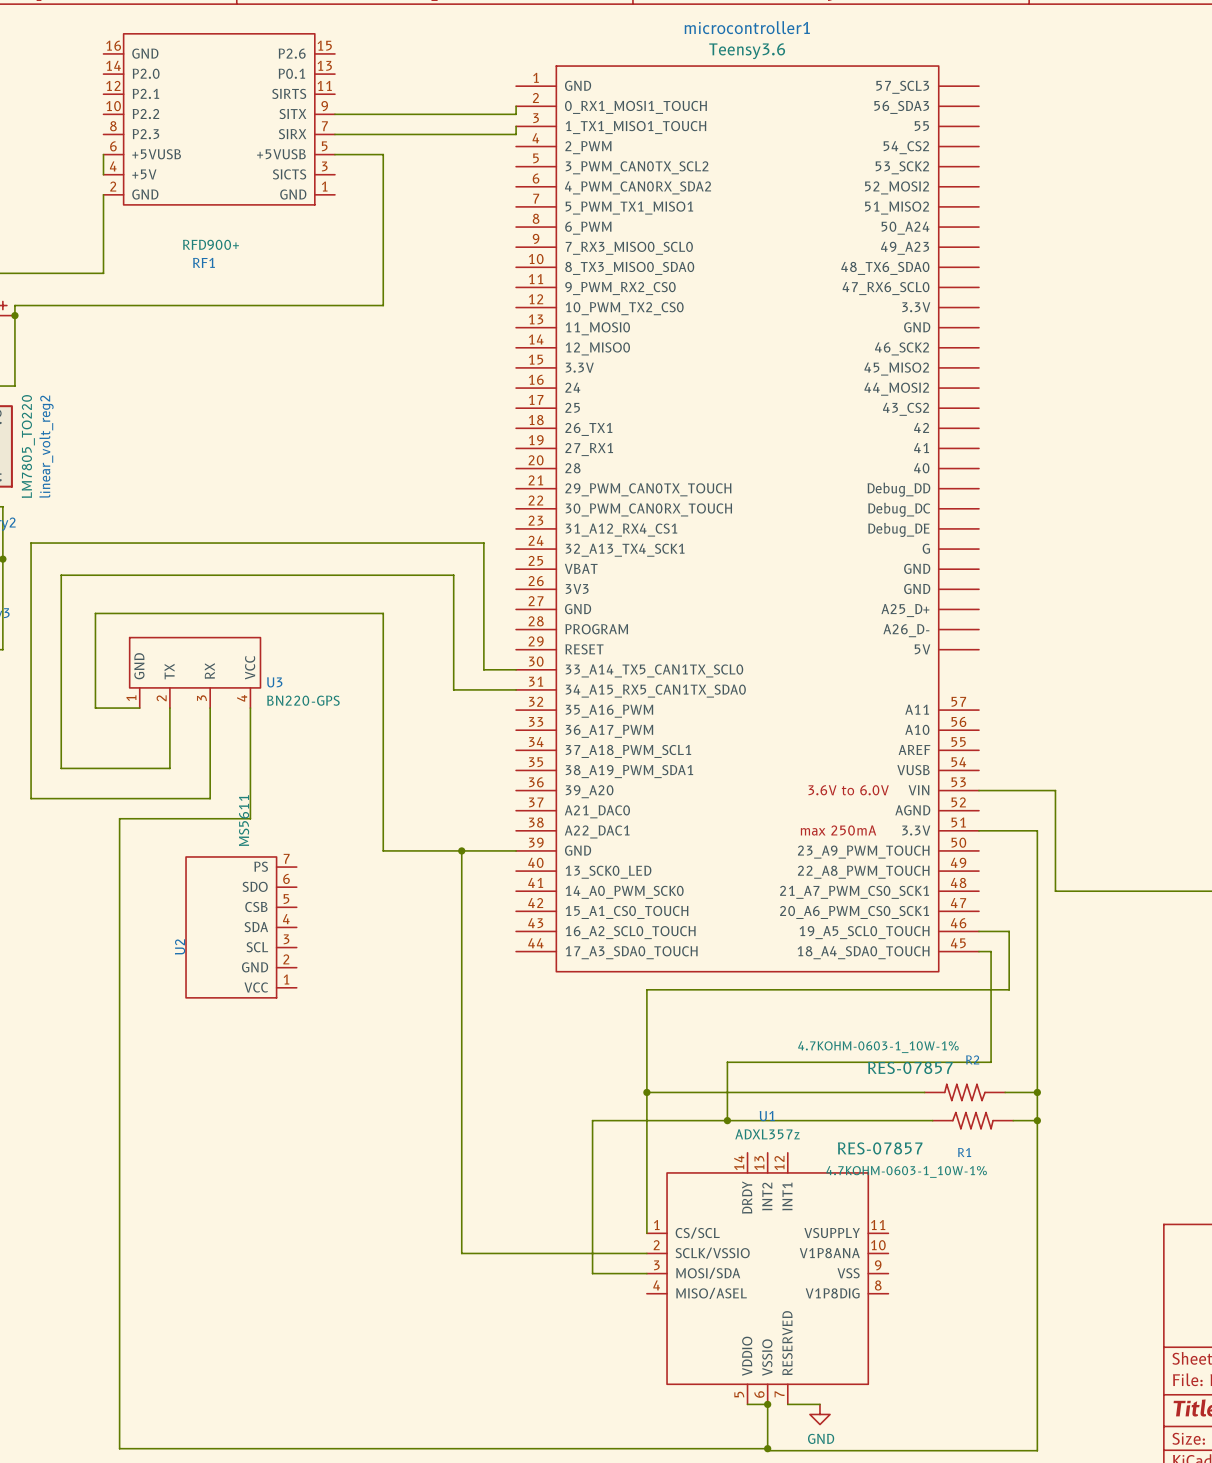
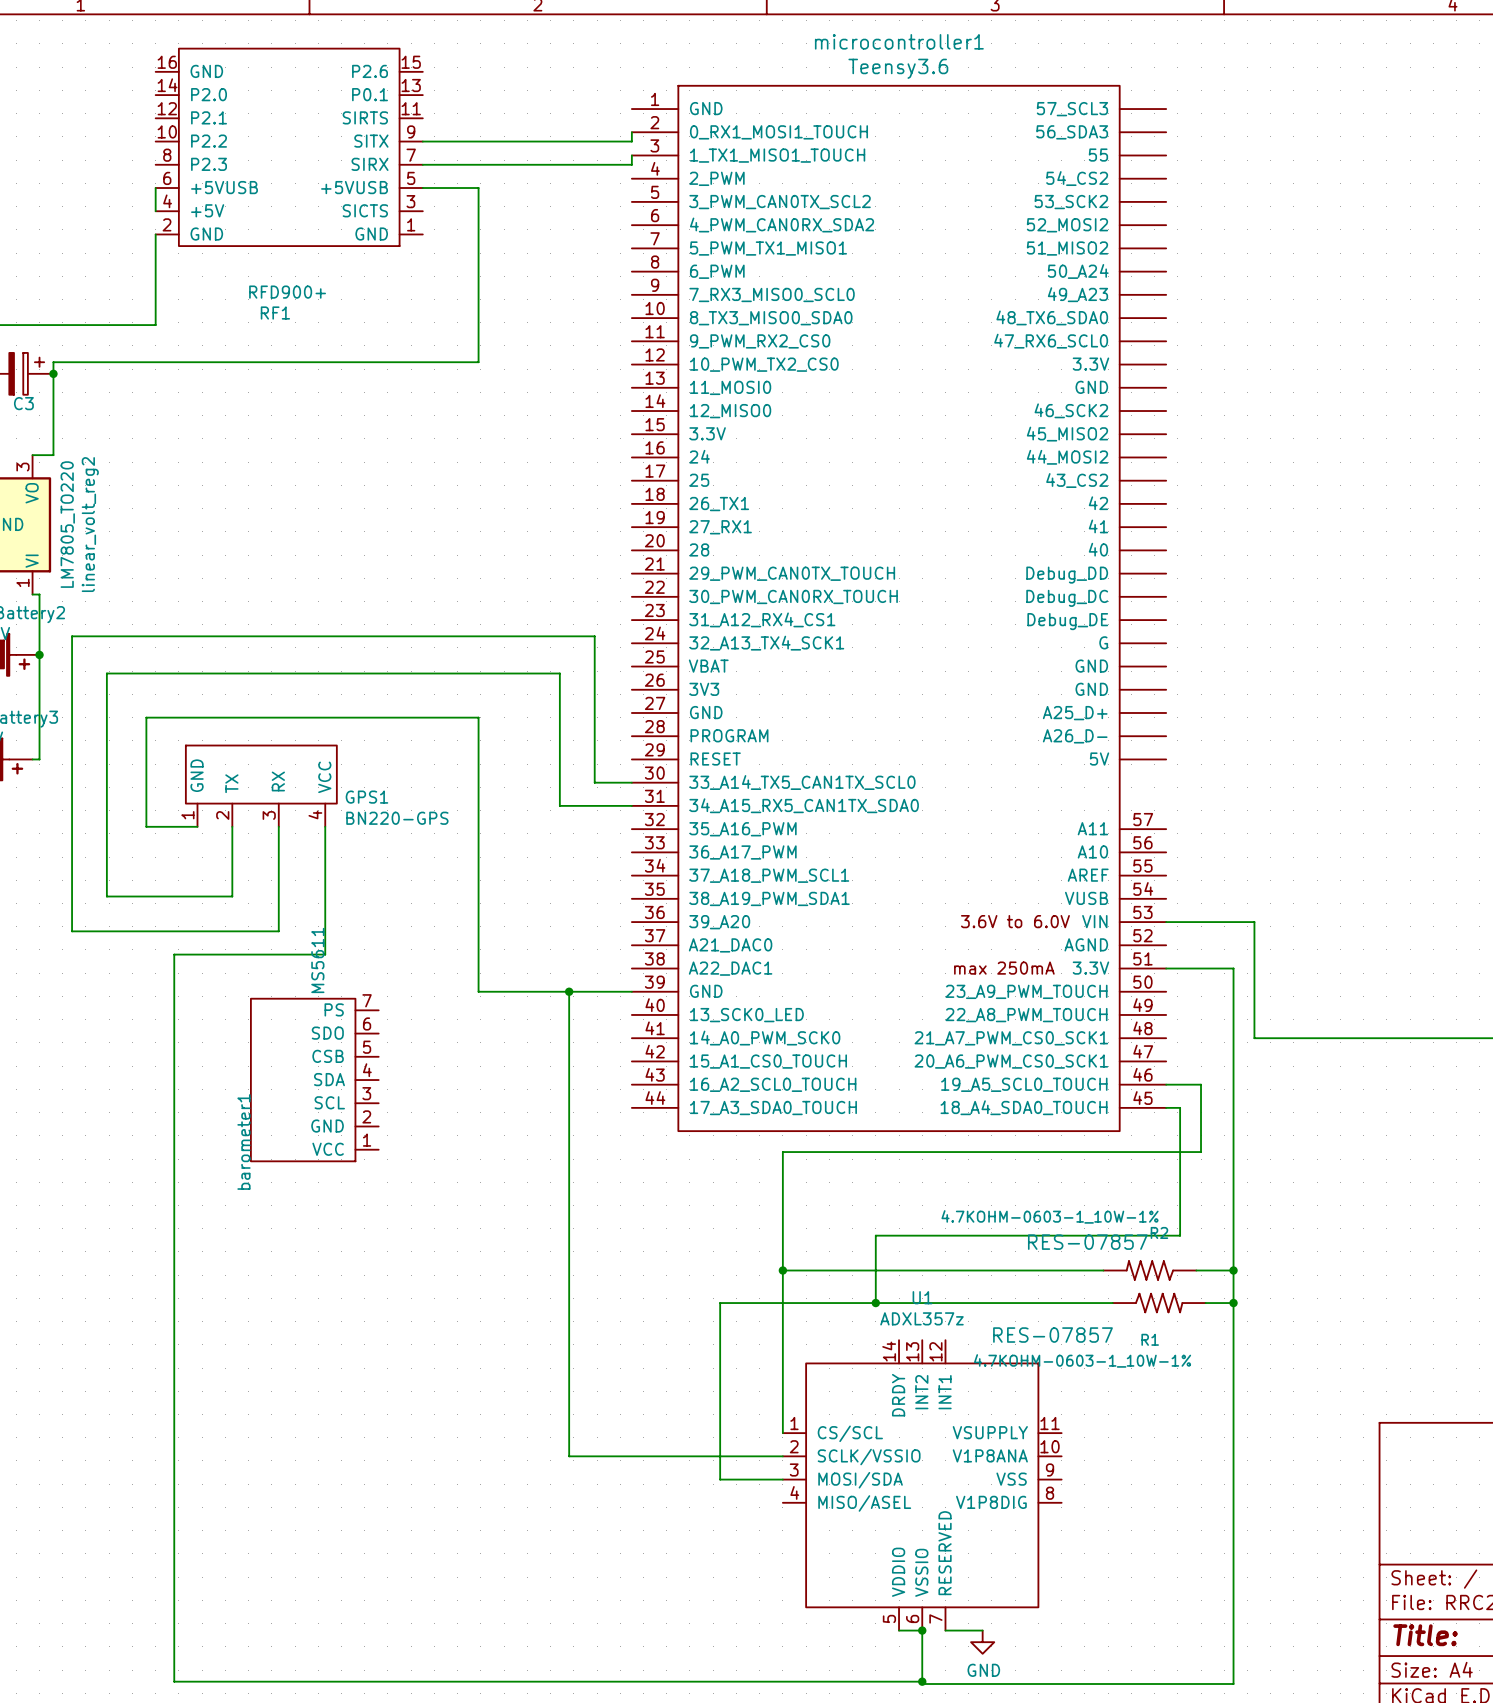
U3 name: U3 (274, 682) -> GPS1 (366, 797)
U2 name: U2 (180, 946) -> barometer1 (243, 1142)

